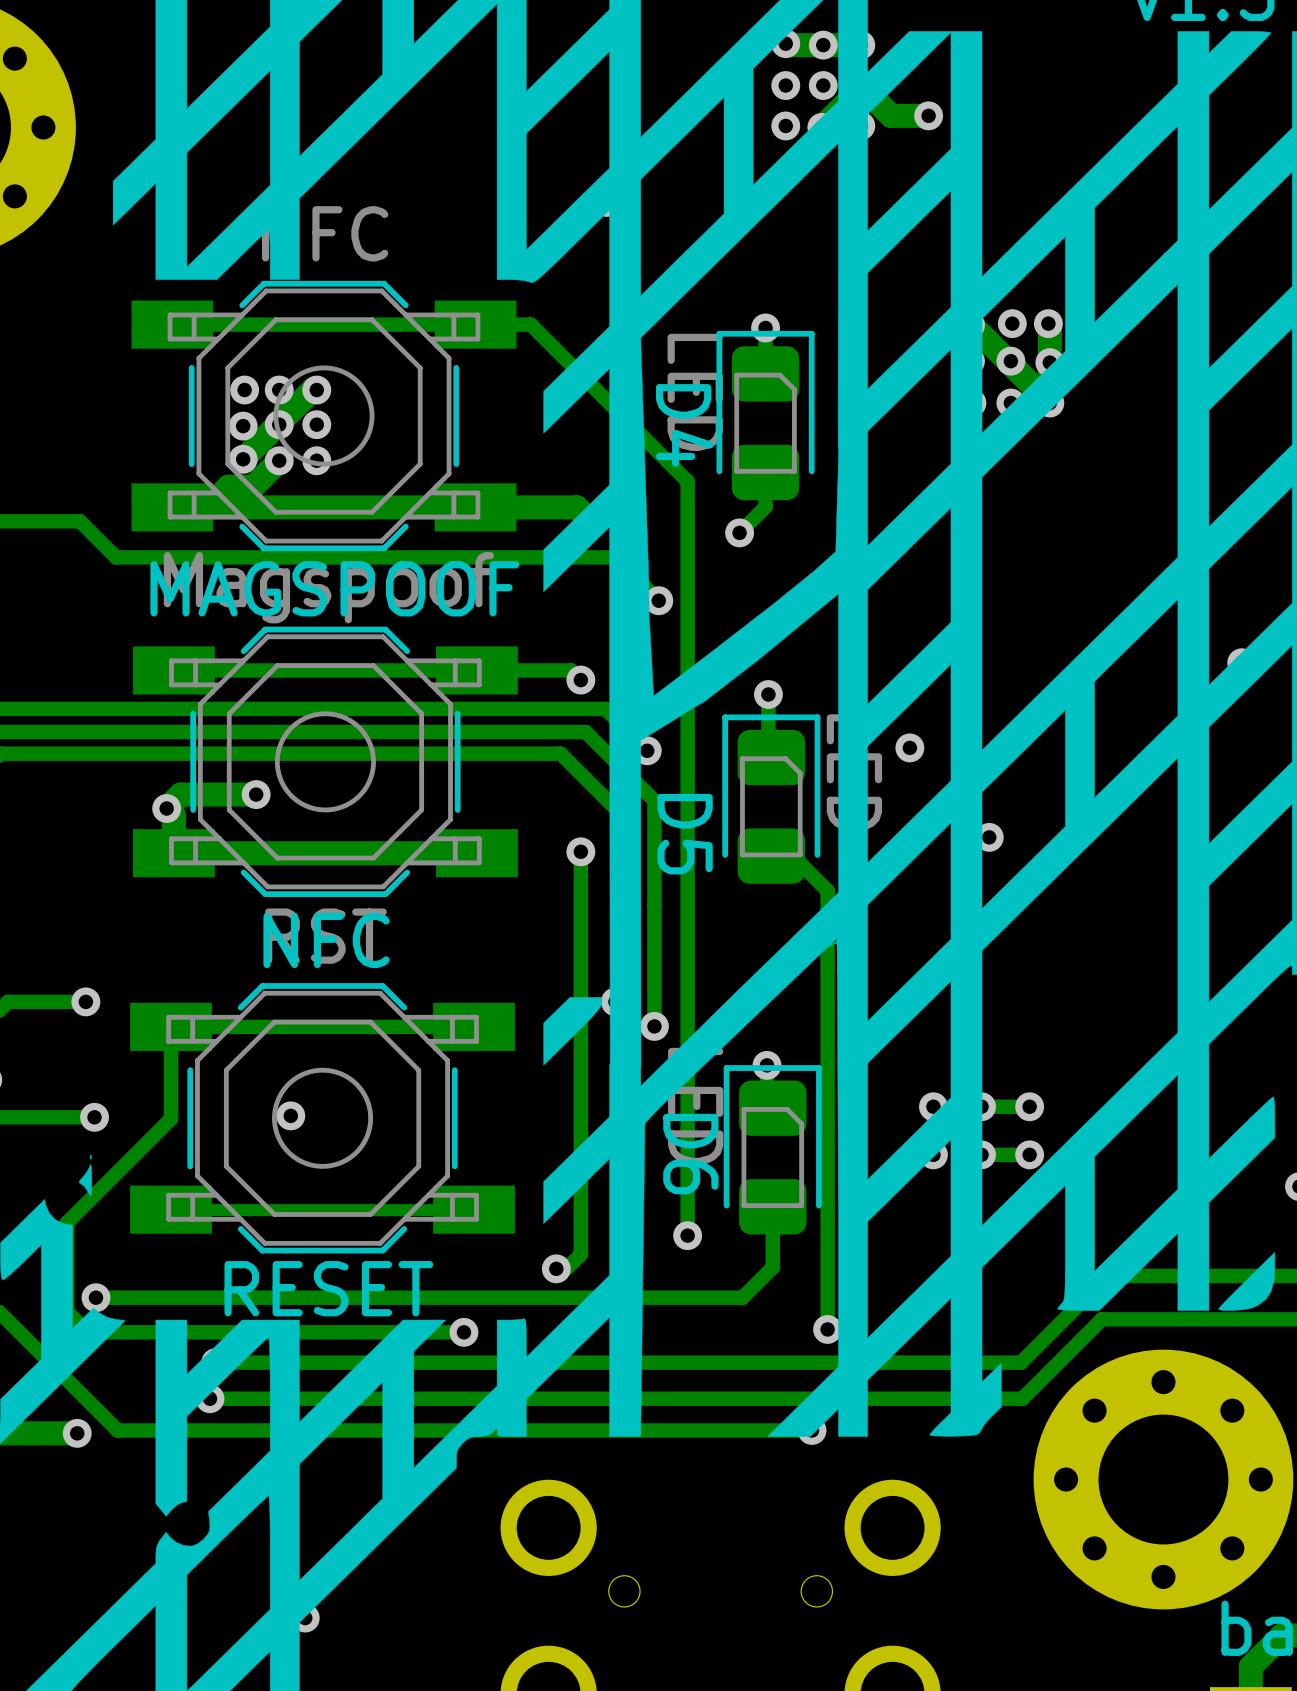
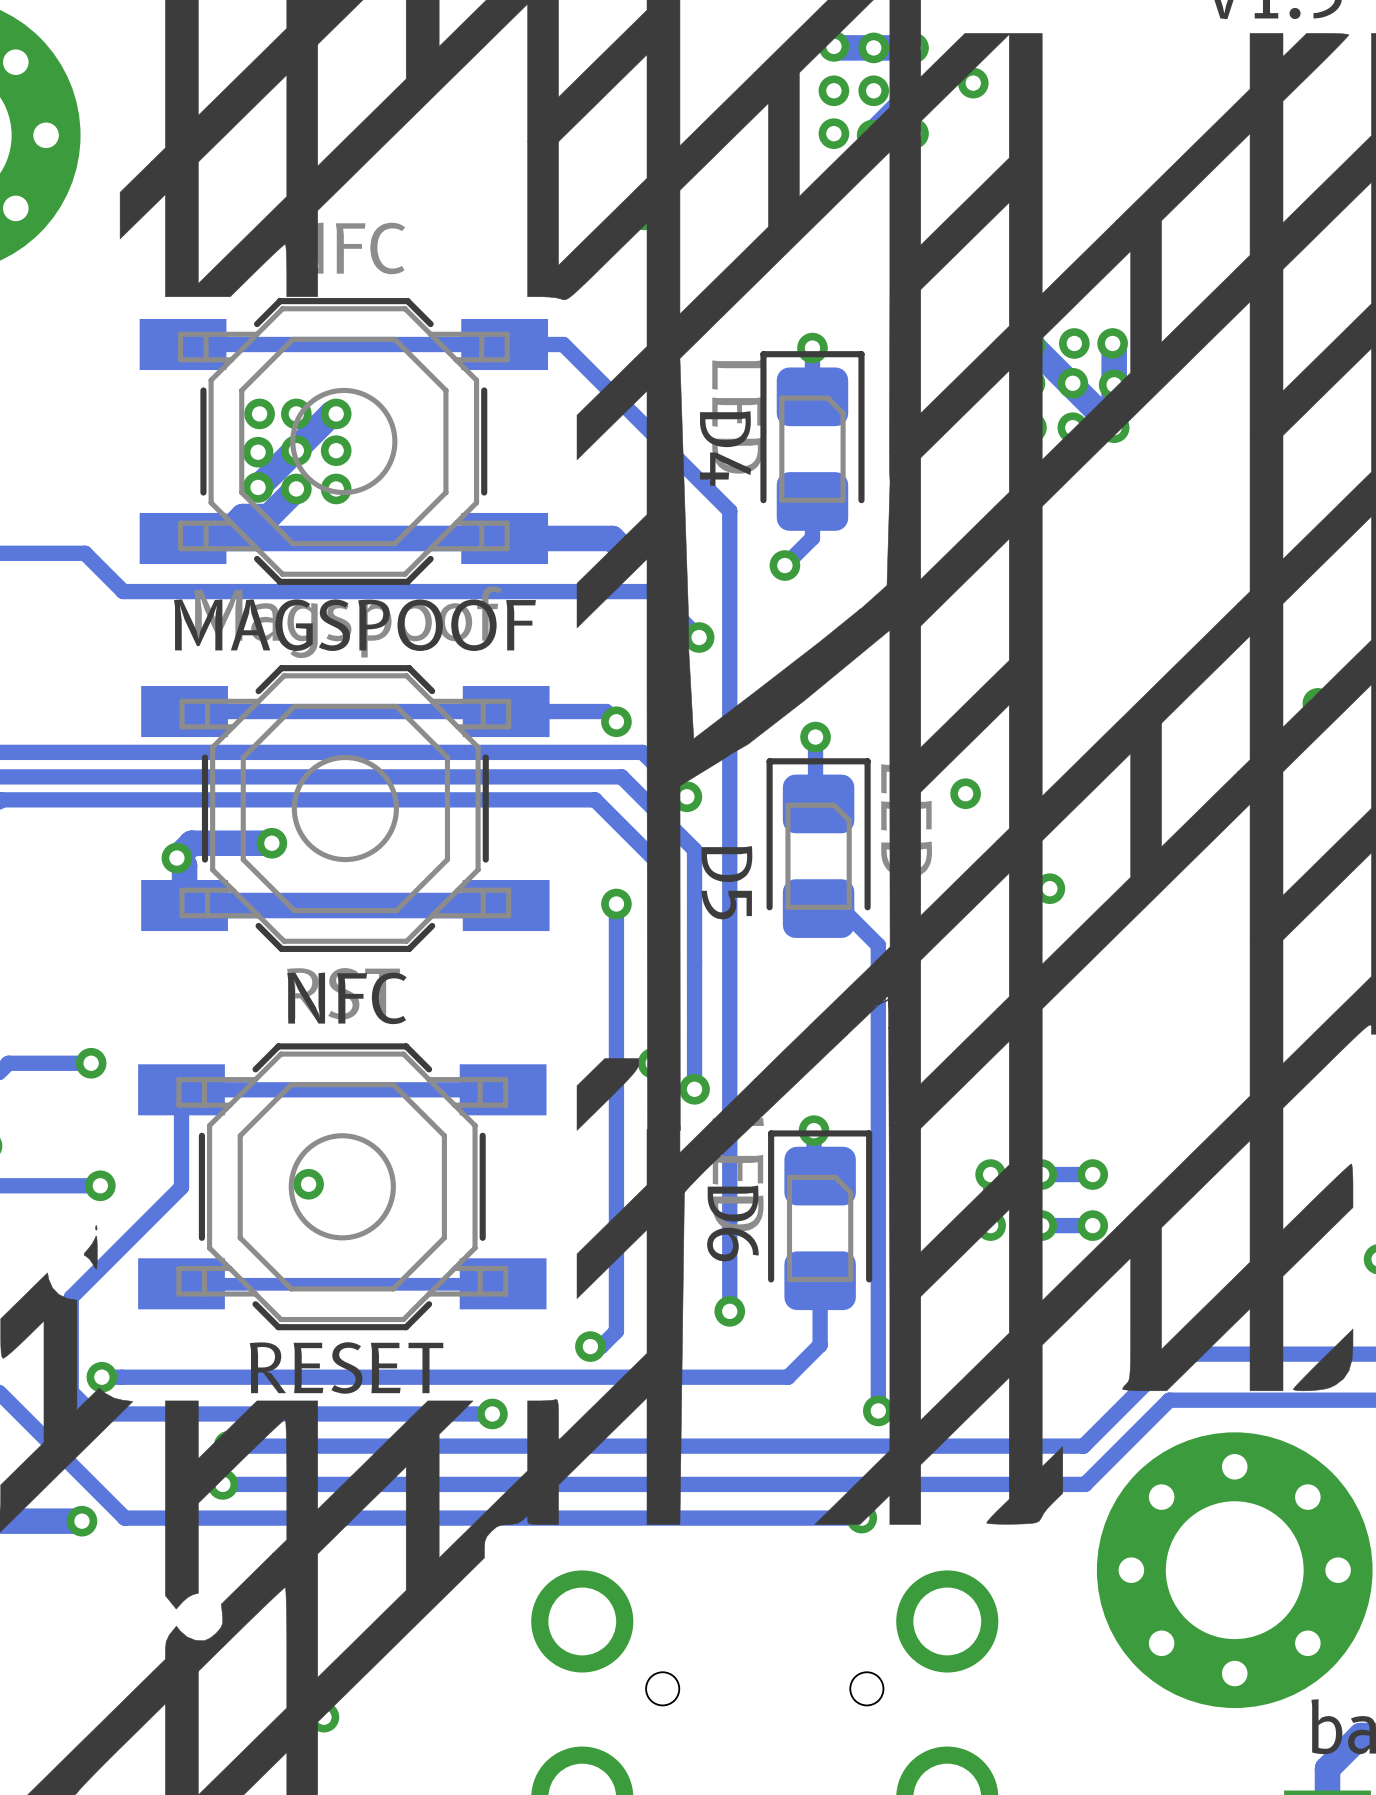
track: (860, 85) (891, 115) (928, 115) -> none
via position: (928, 115) -> (973, 83)

